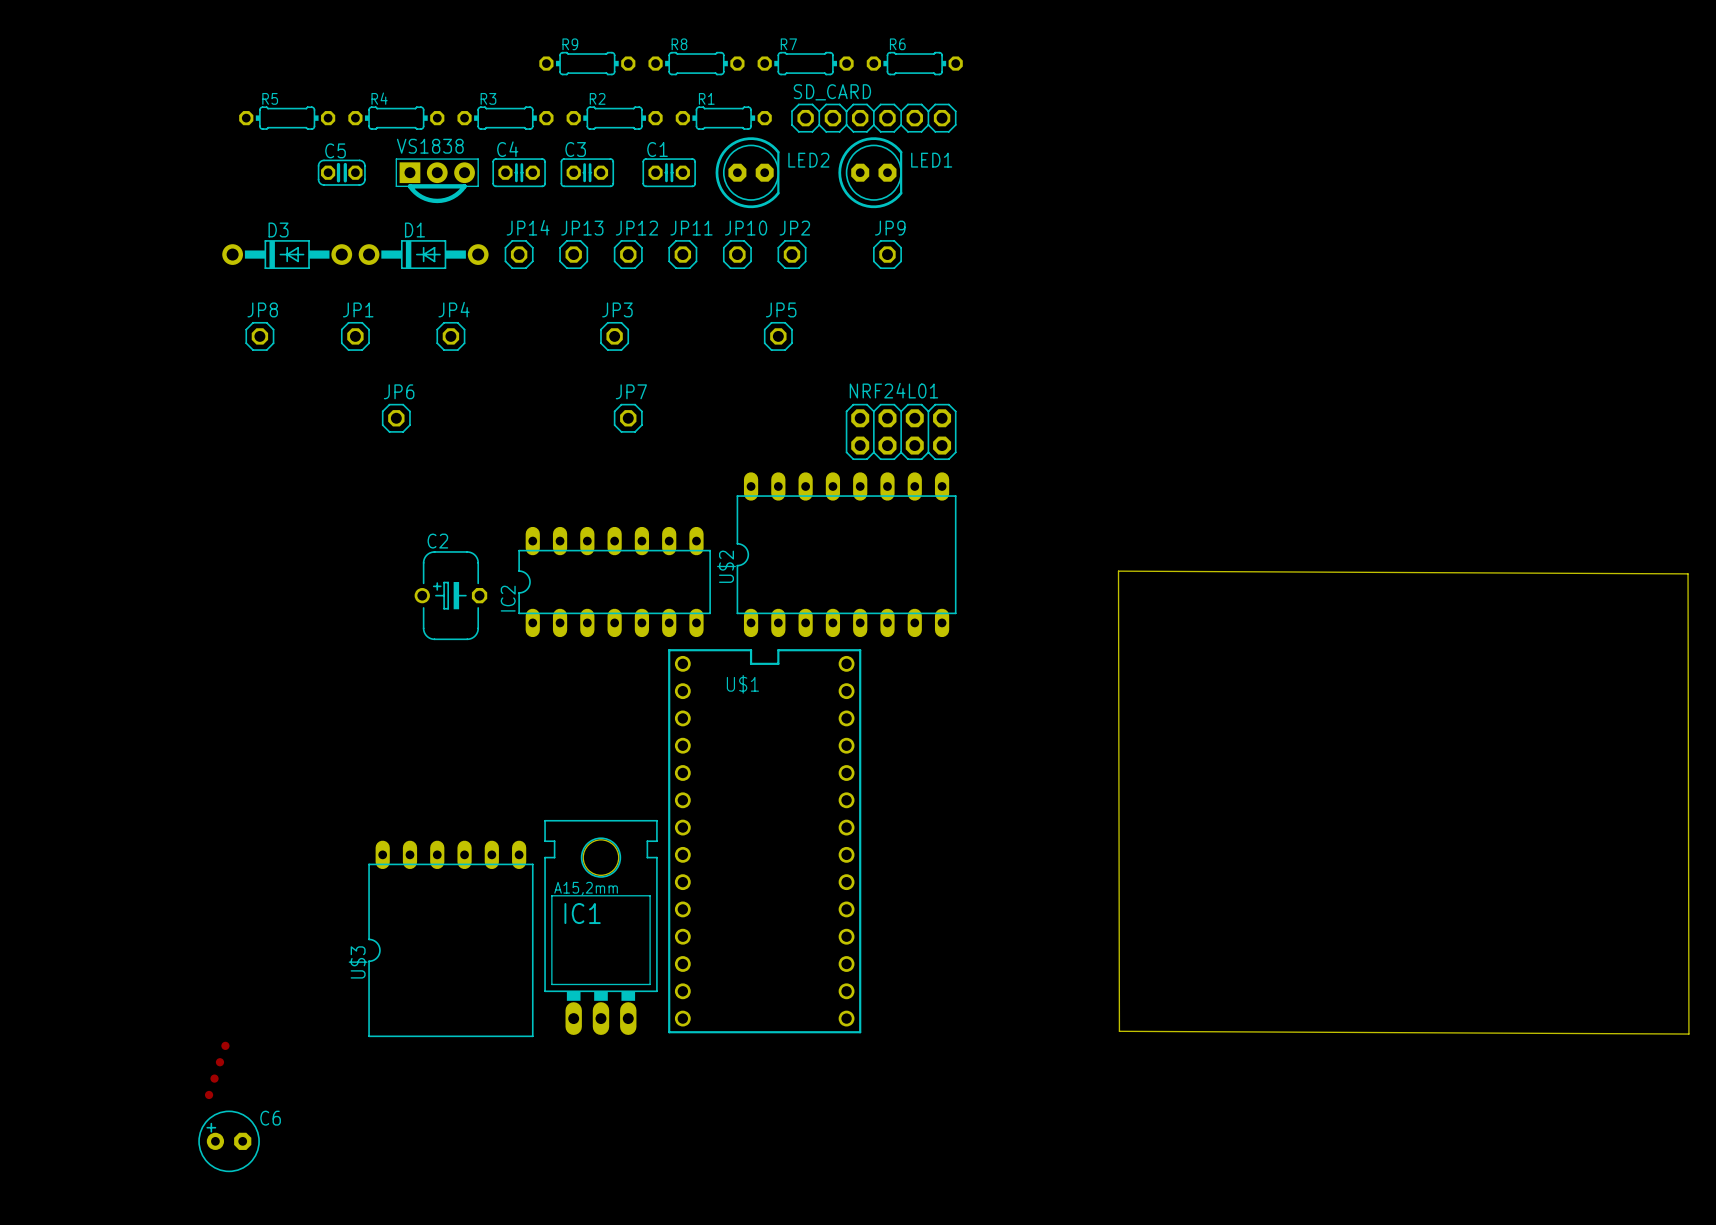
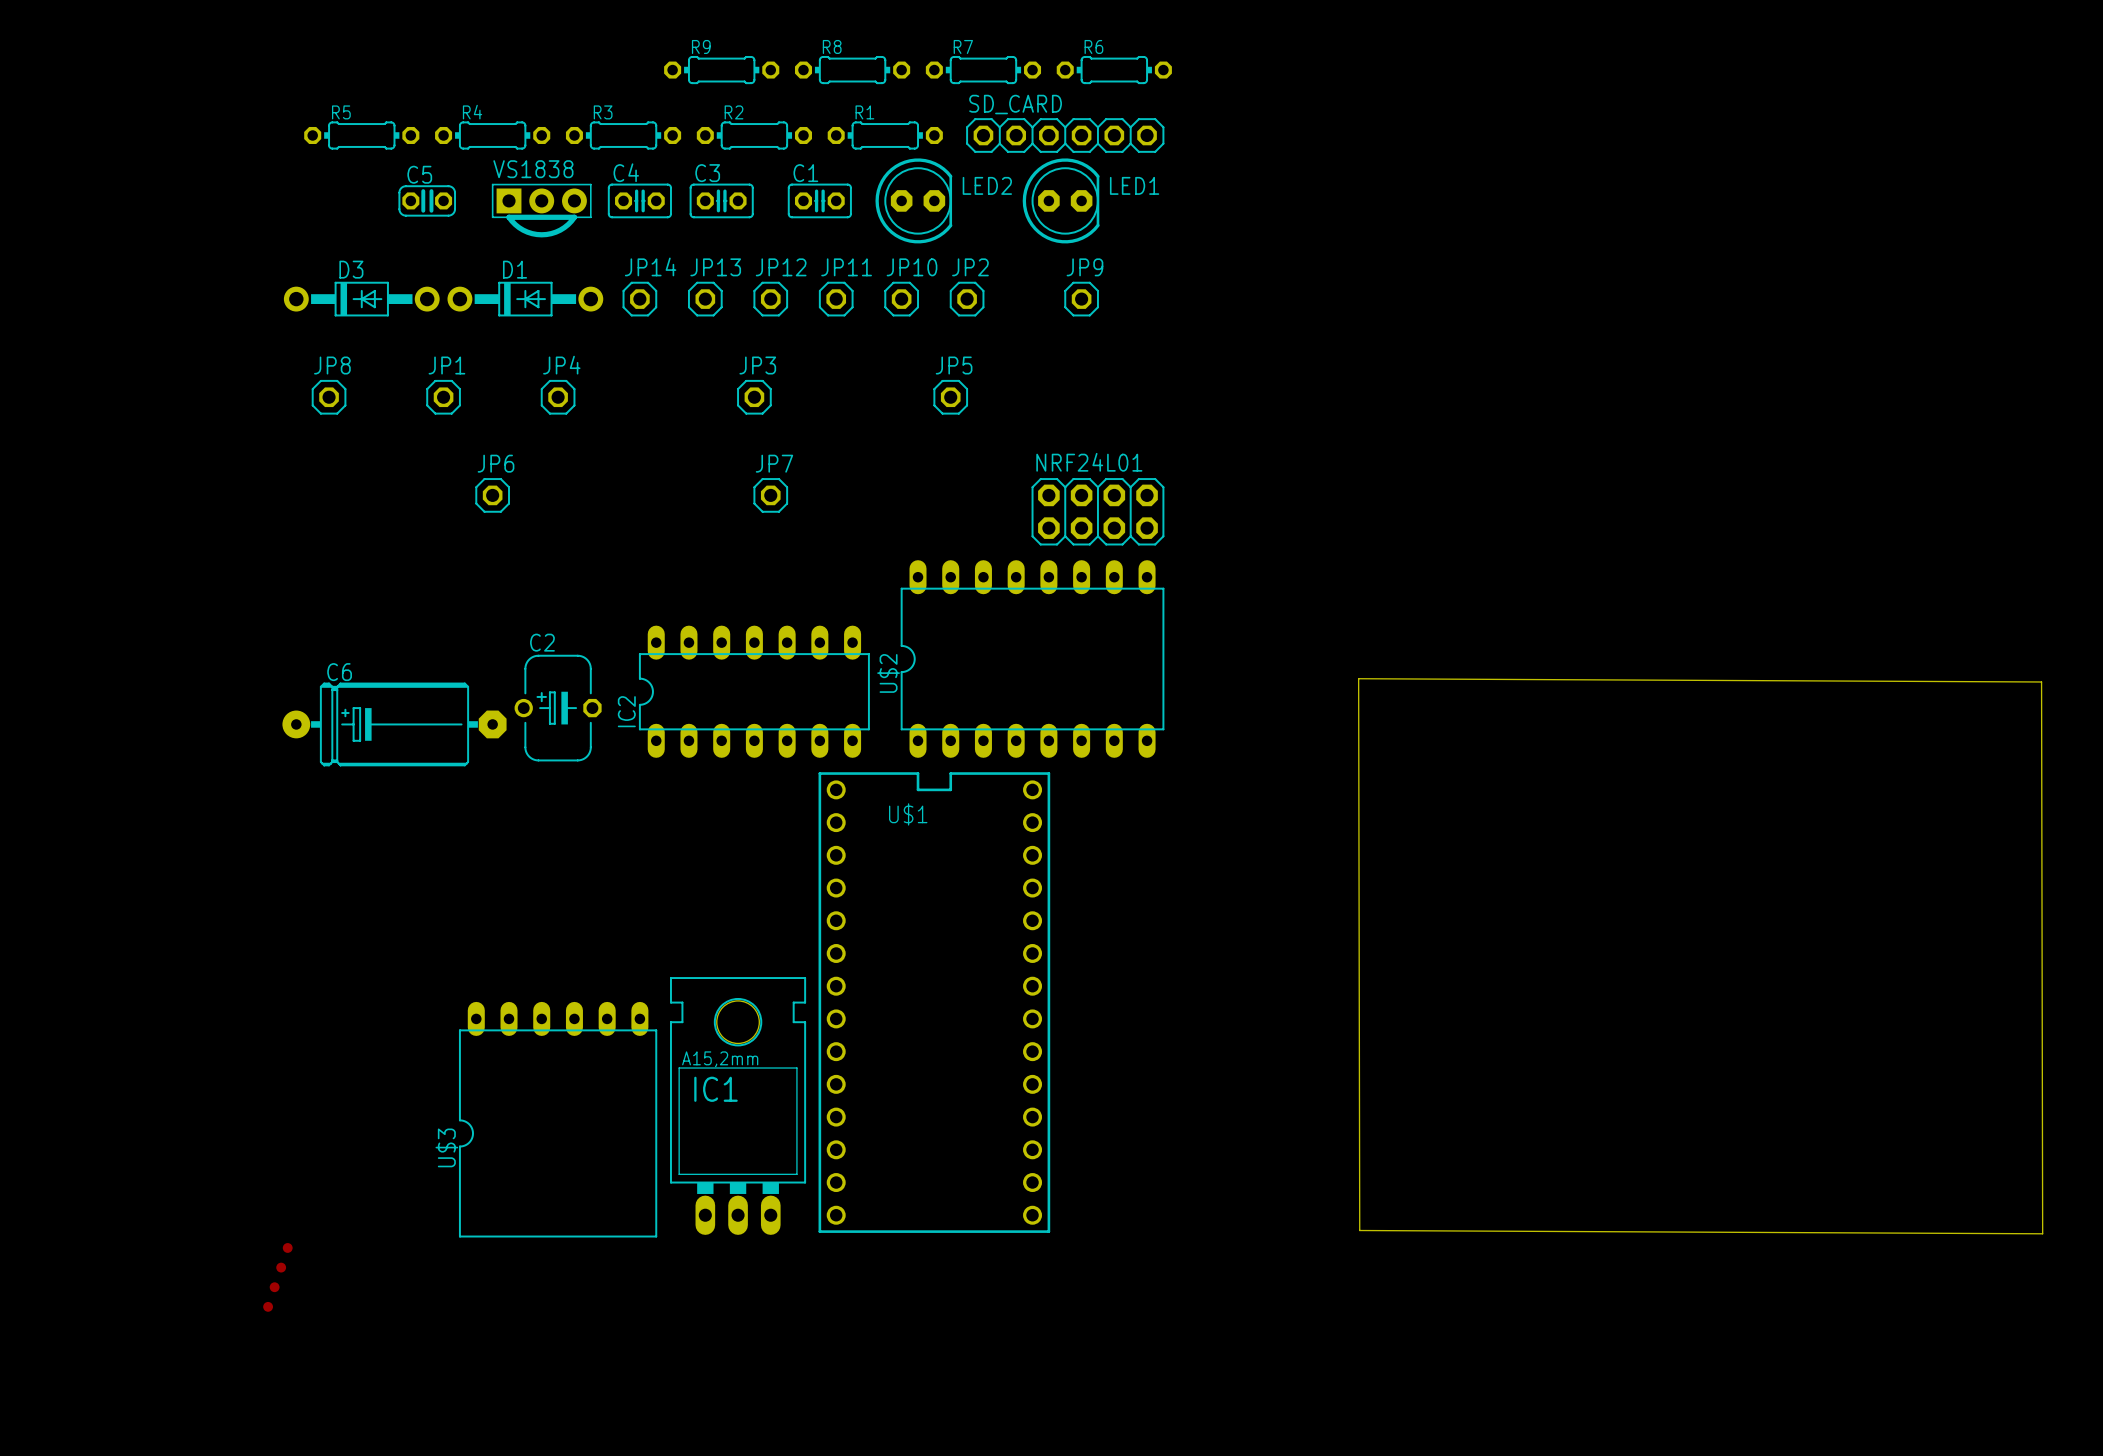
C6 footprint: [198, 1110, 260, 1173] -> [282, 682, 507, 767]
C6 name position: C6 (270, 1118) -> C6 (339, 672)

